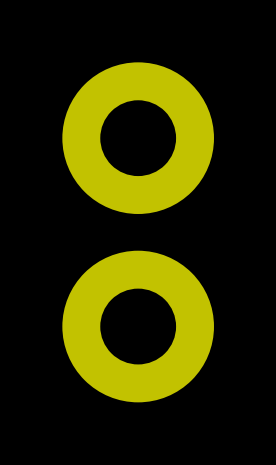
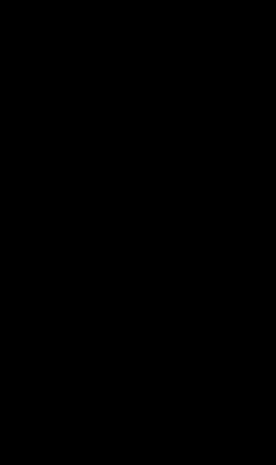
part: (138, 138) -> none
part: (138, 326) -> none

